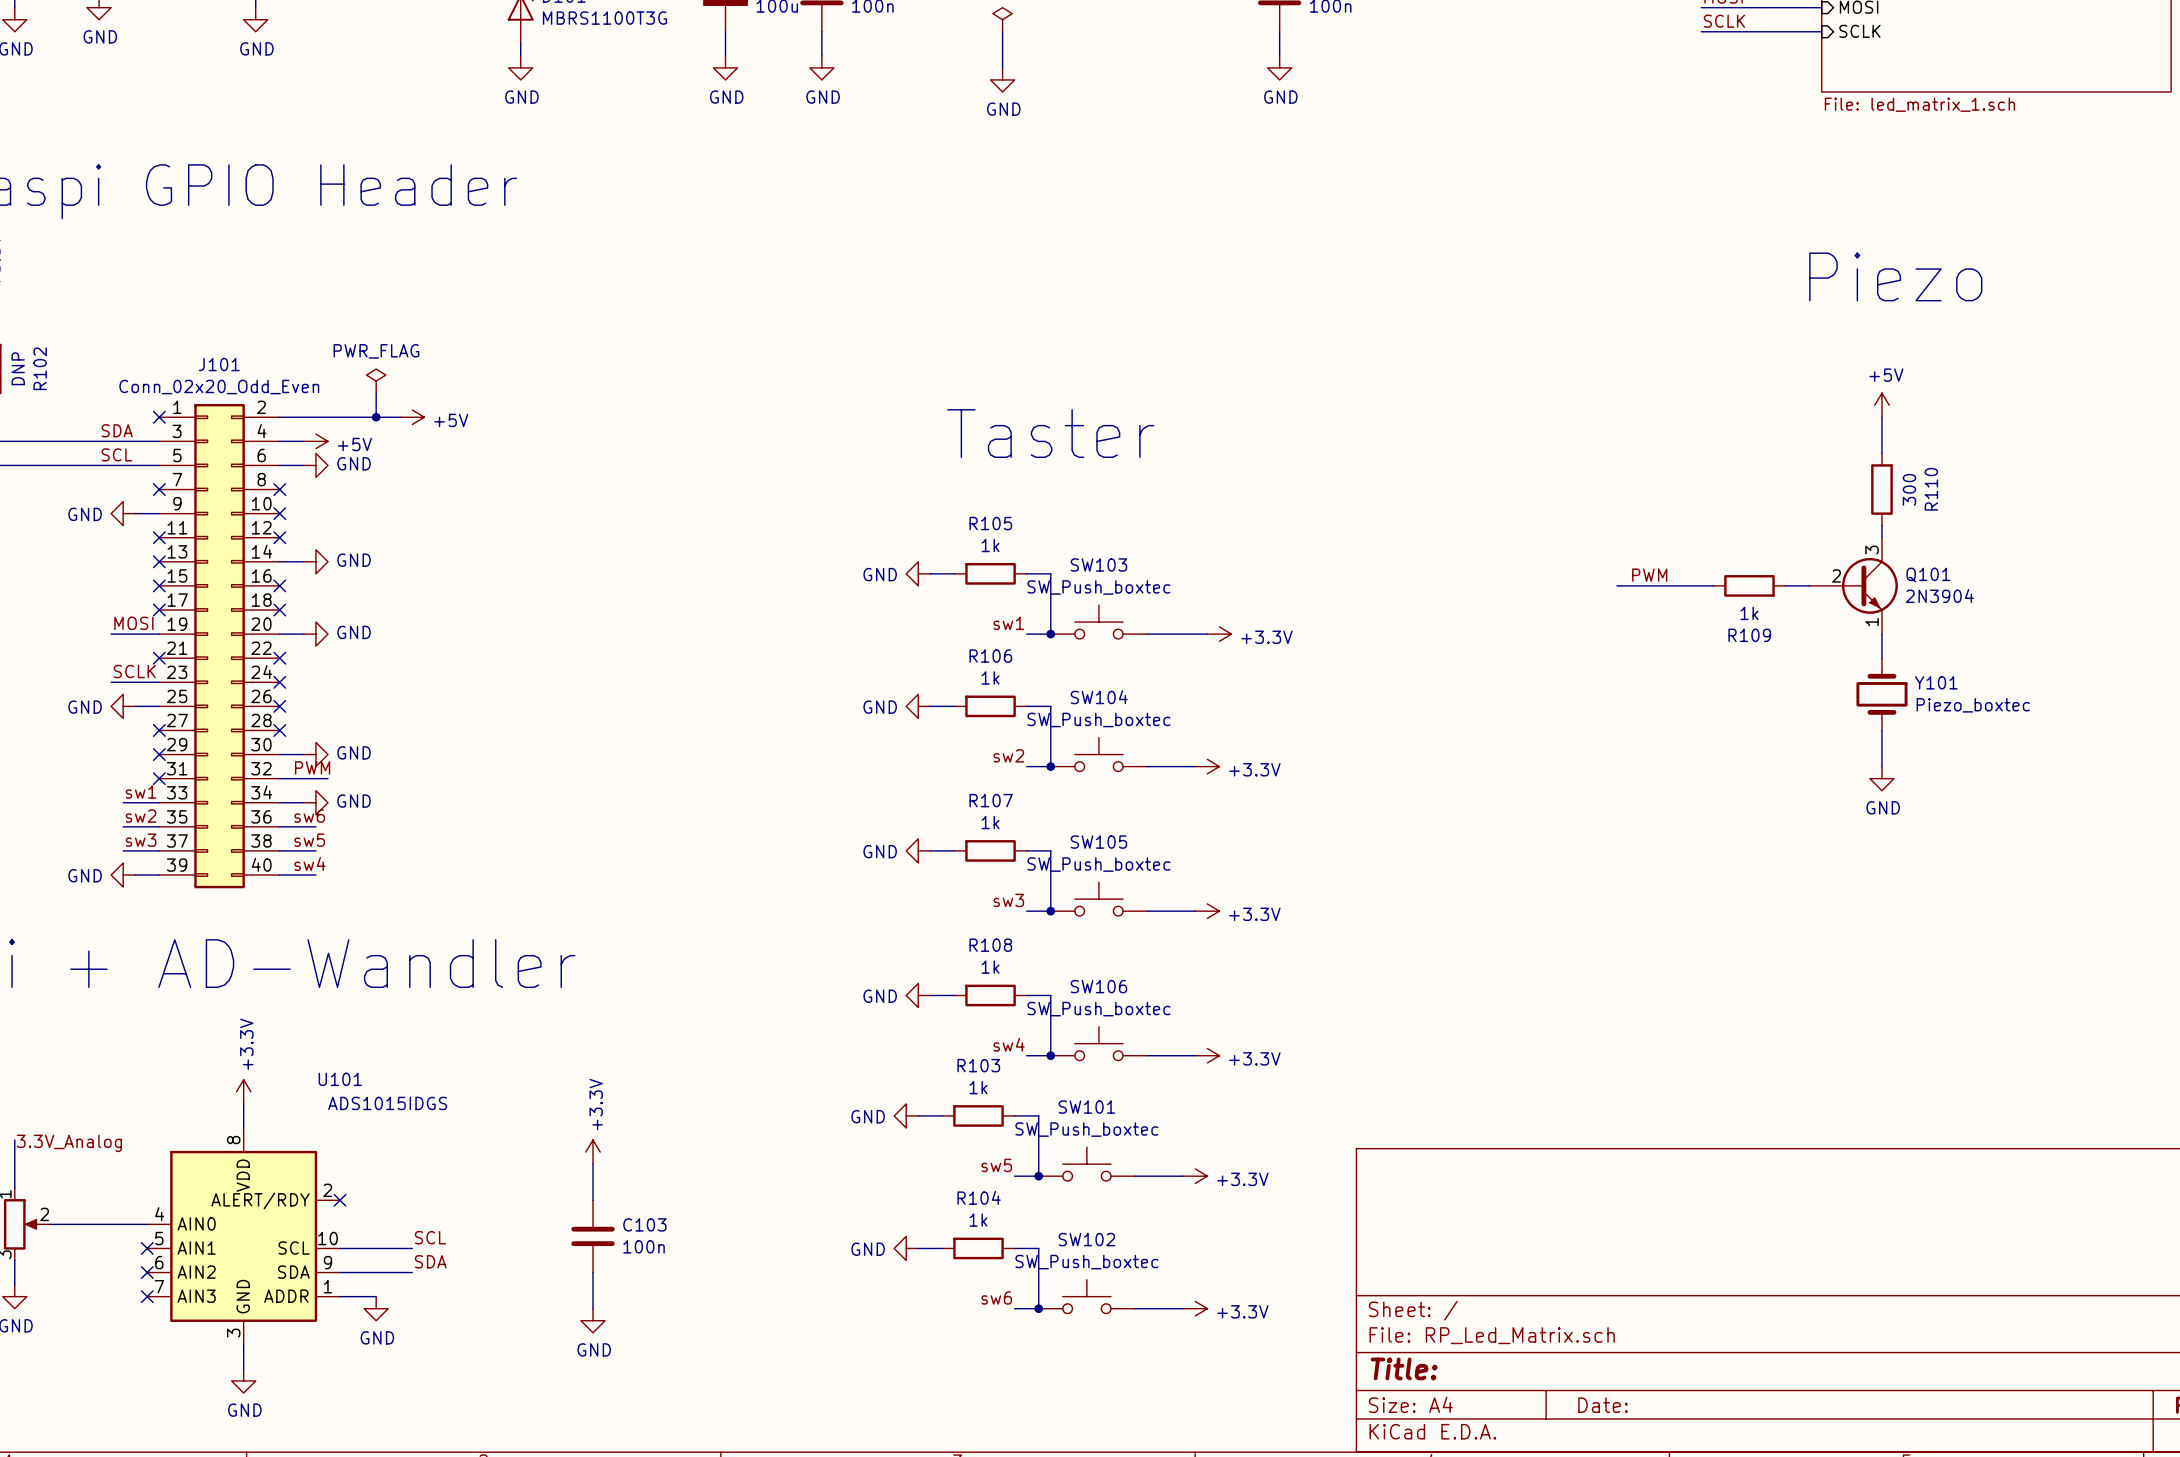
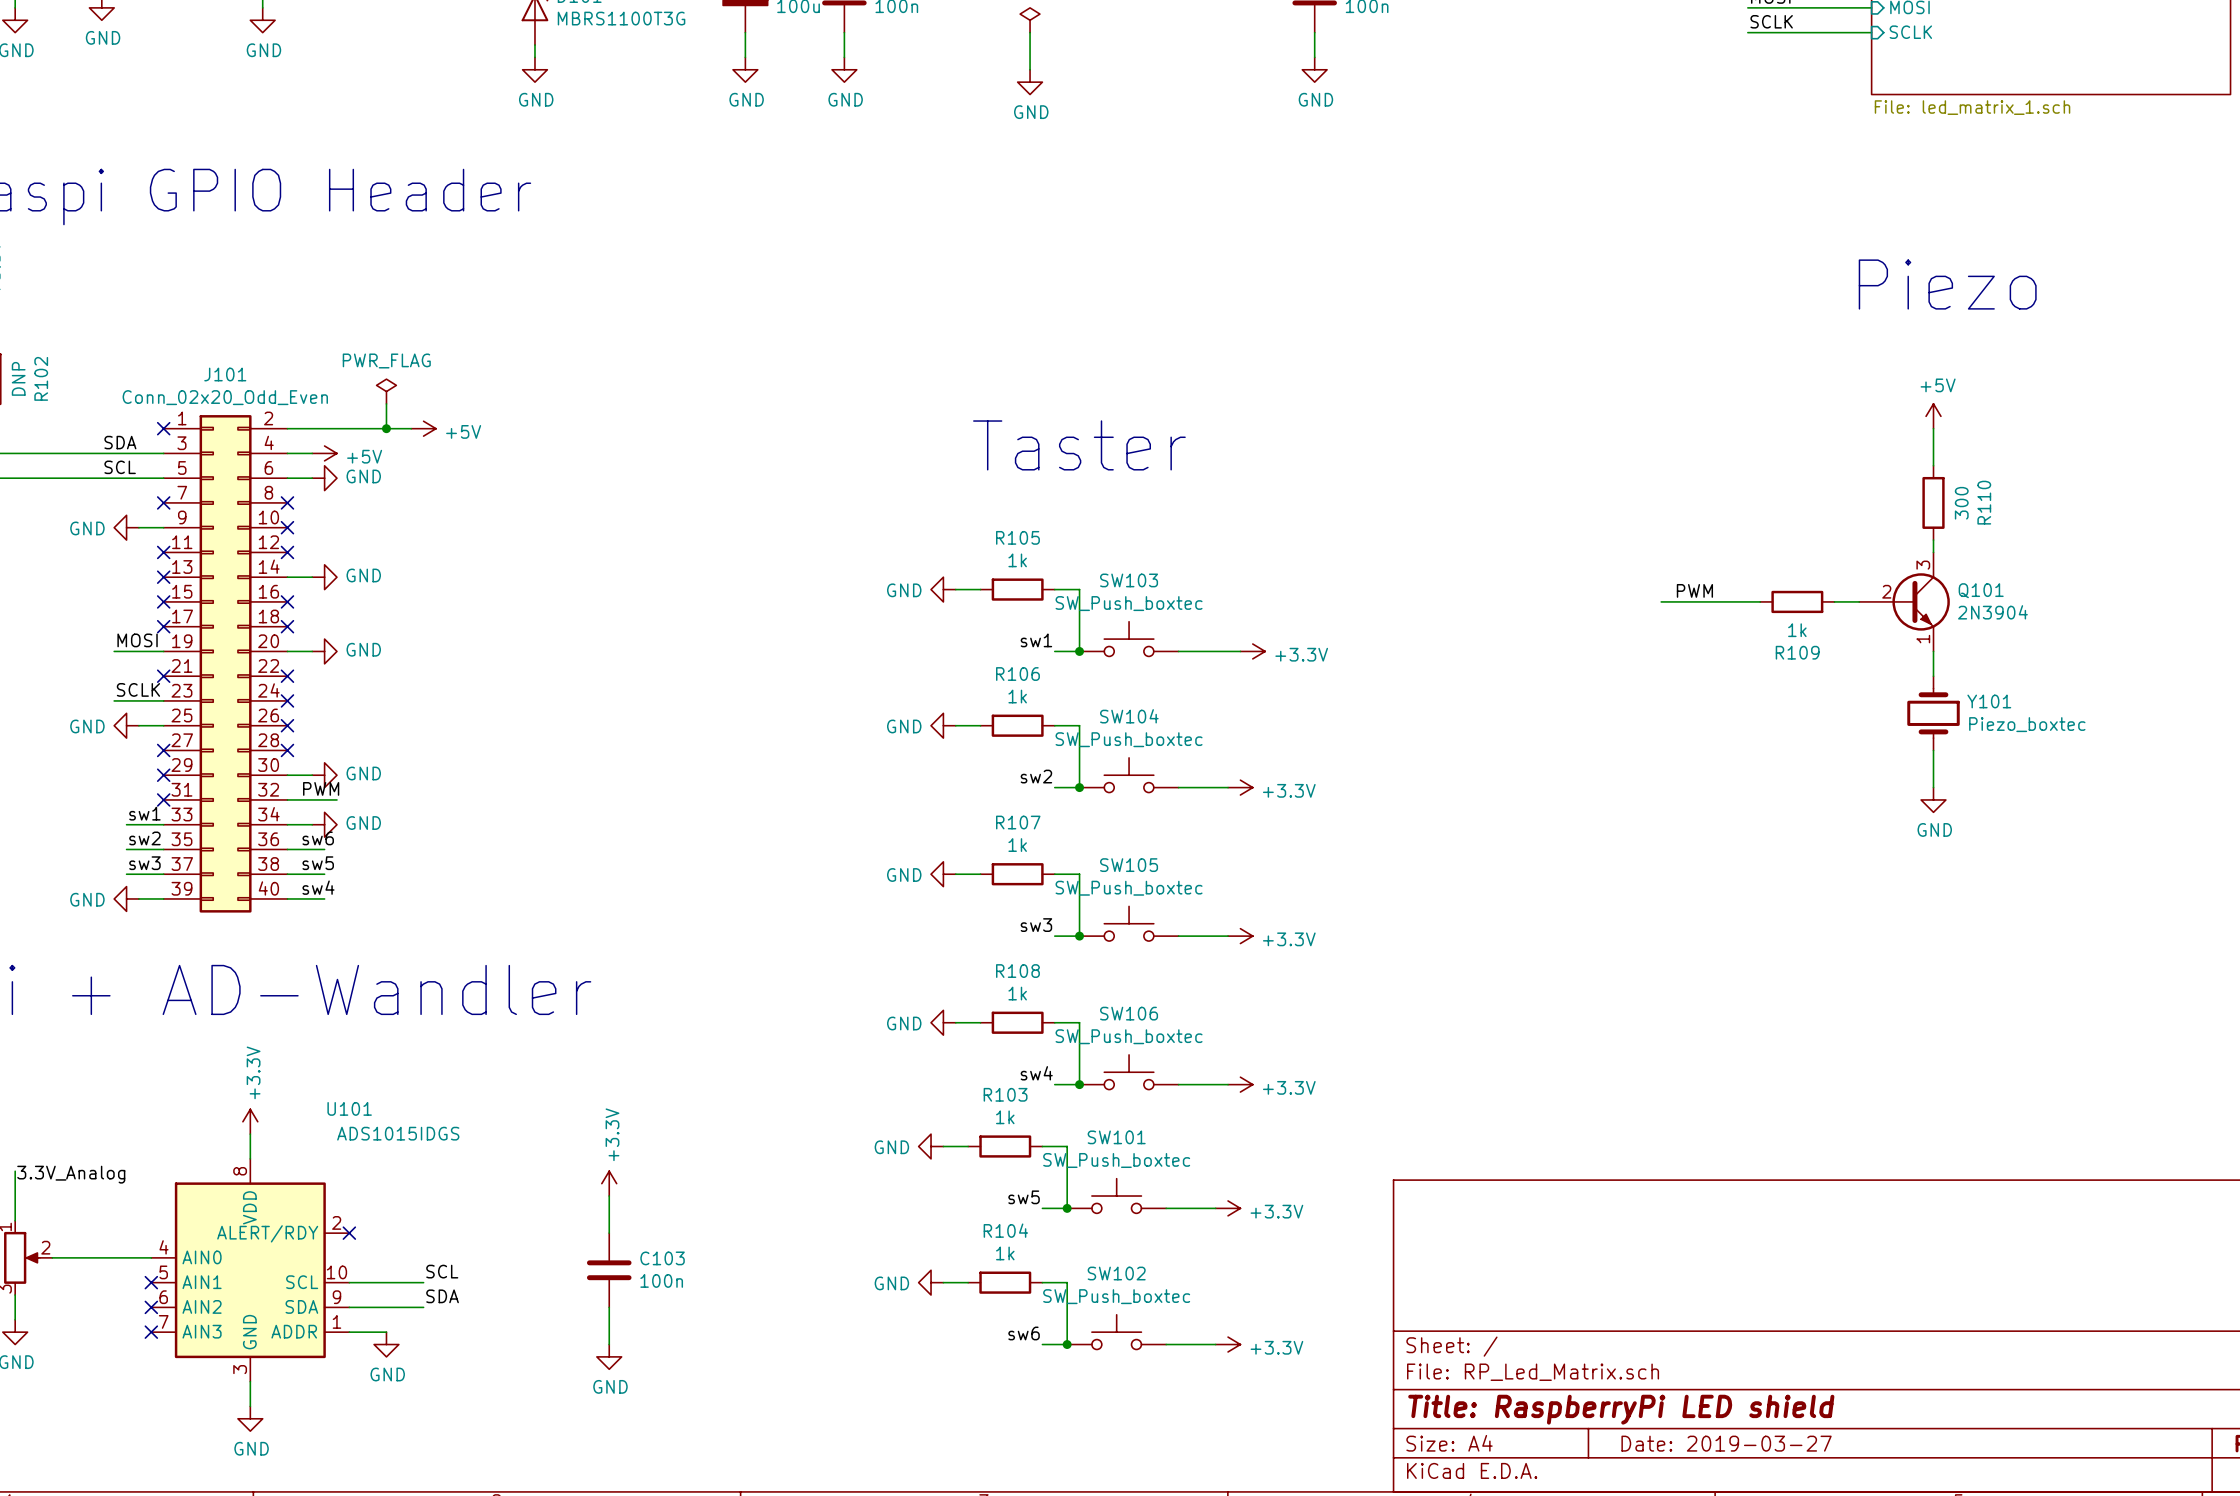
title block: Title: (1404, 1368) -> Title: RaspberryPi LED shield (1621, 1409)
title block: Date: (1602, 1405) -> Date: 2019-03-27 (1726, 1443)

